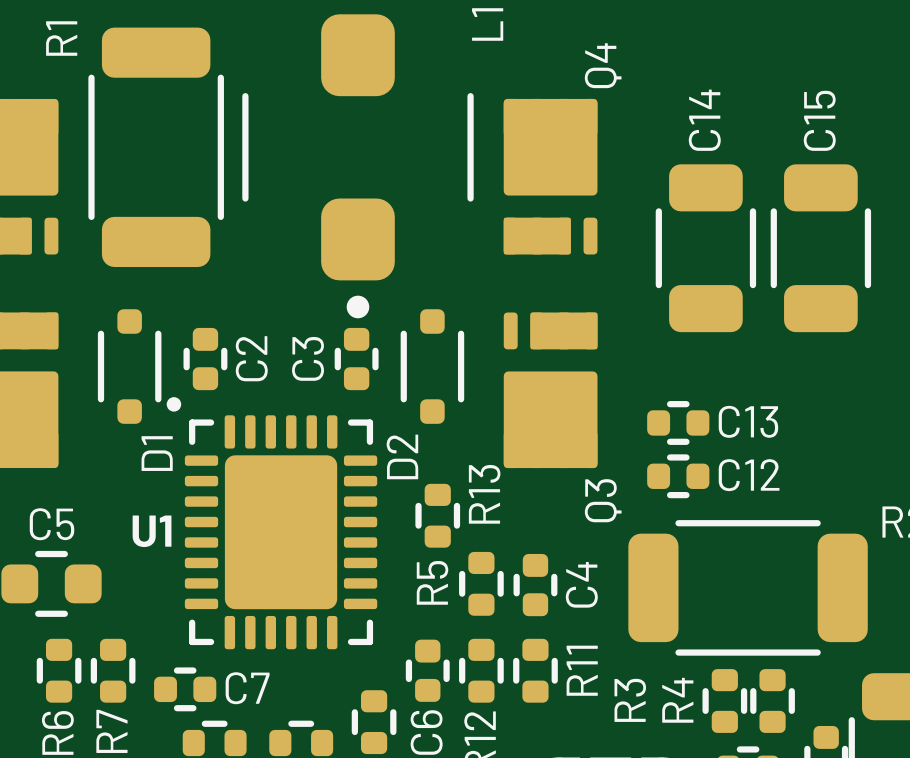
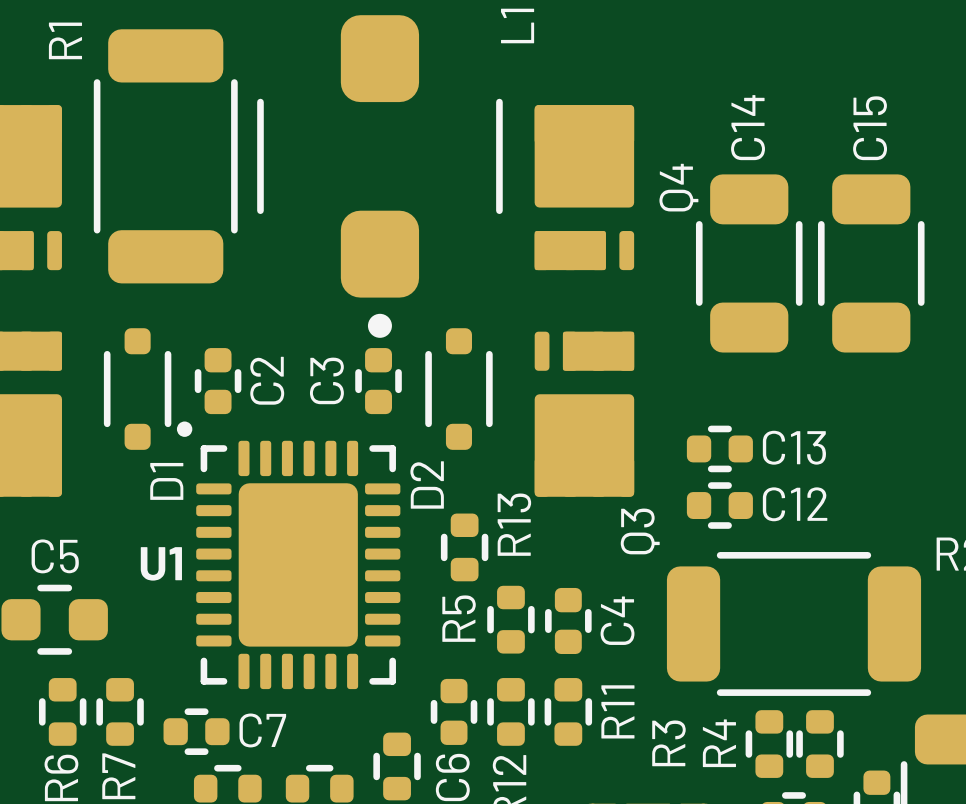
Q4 name position: Q4 (603, 65) -> Q4 (678, 187)

